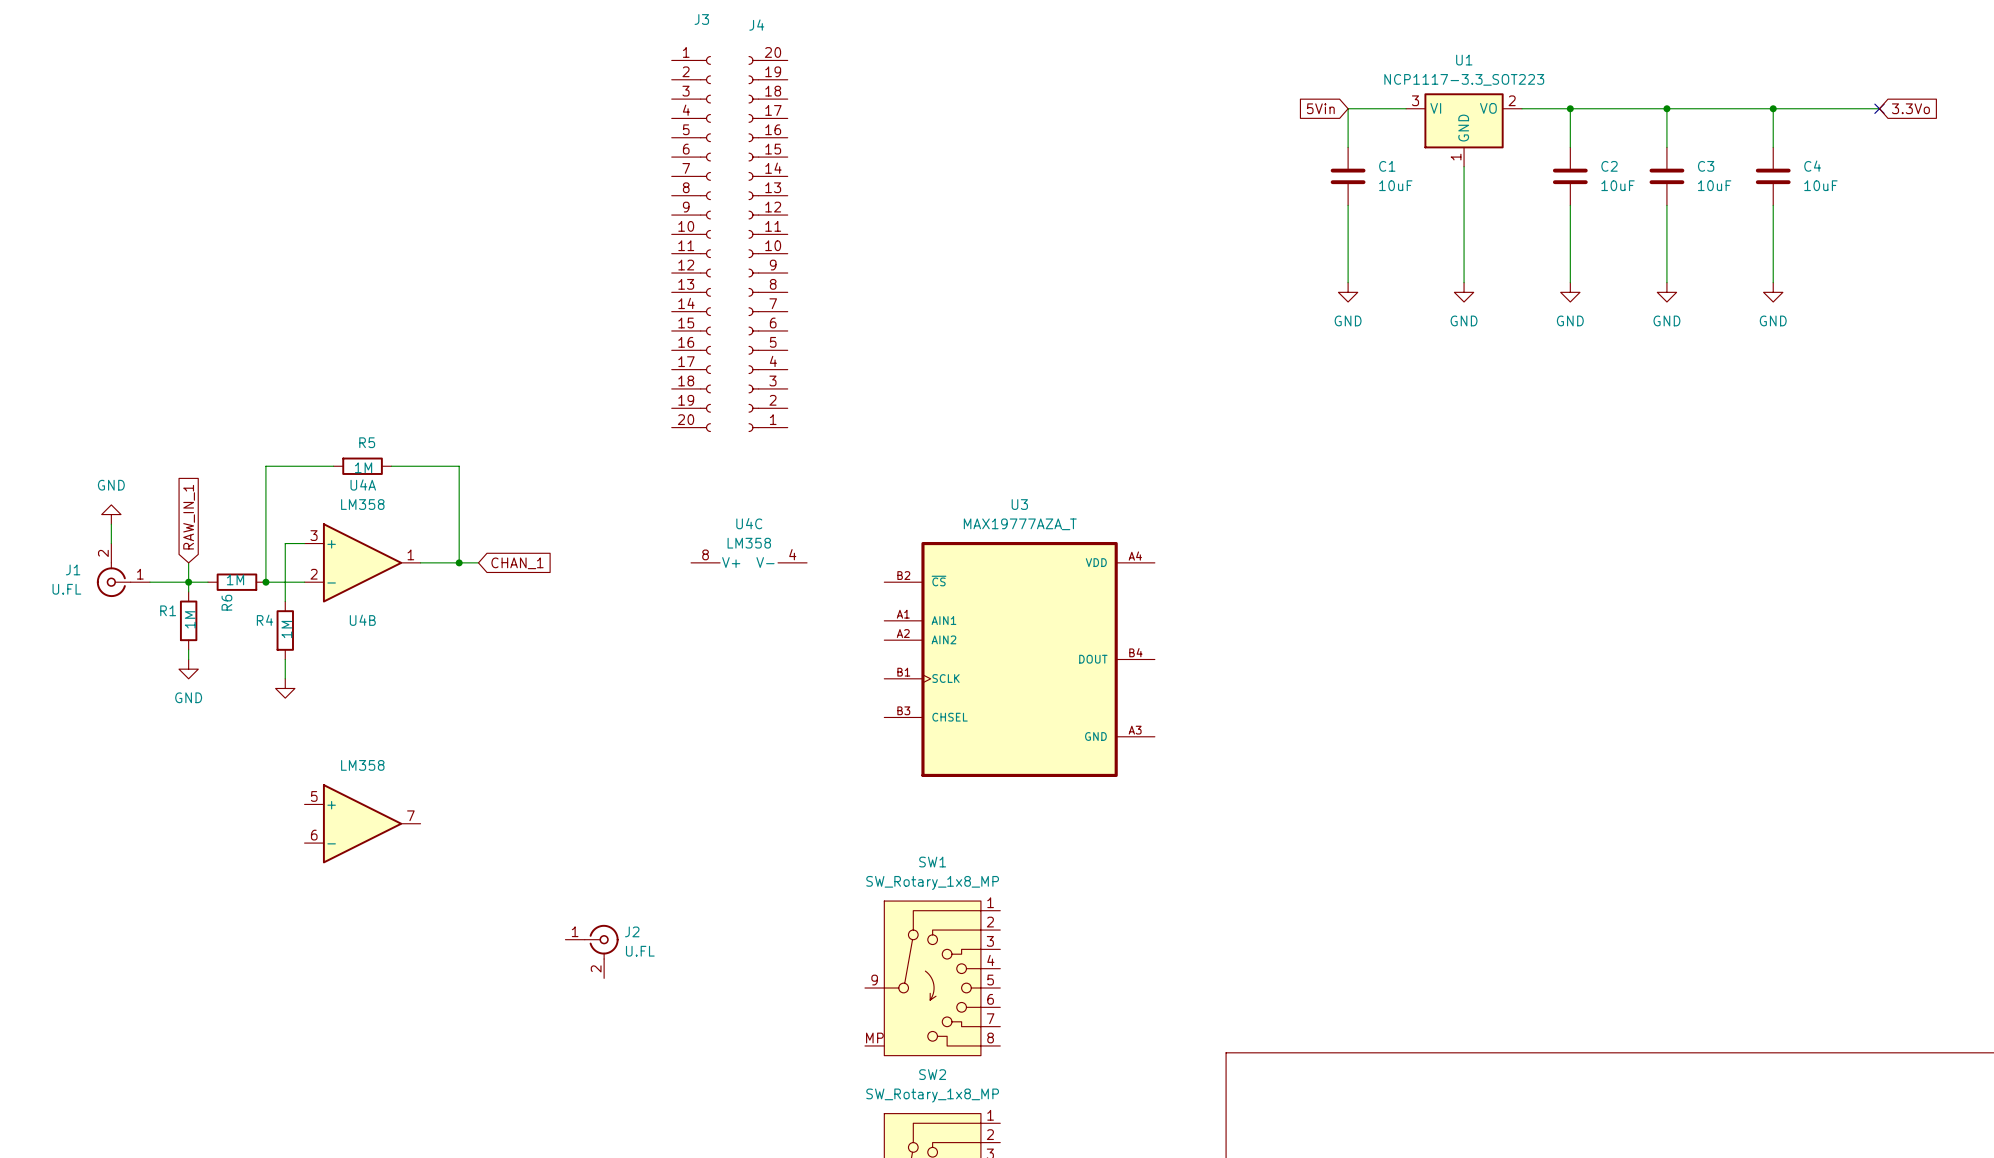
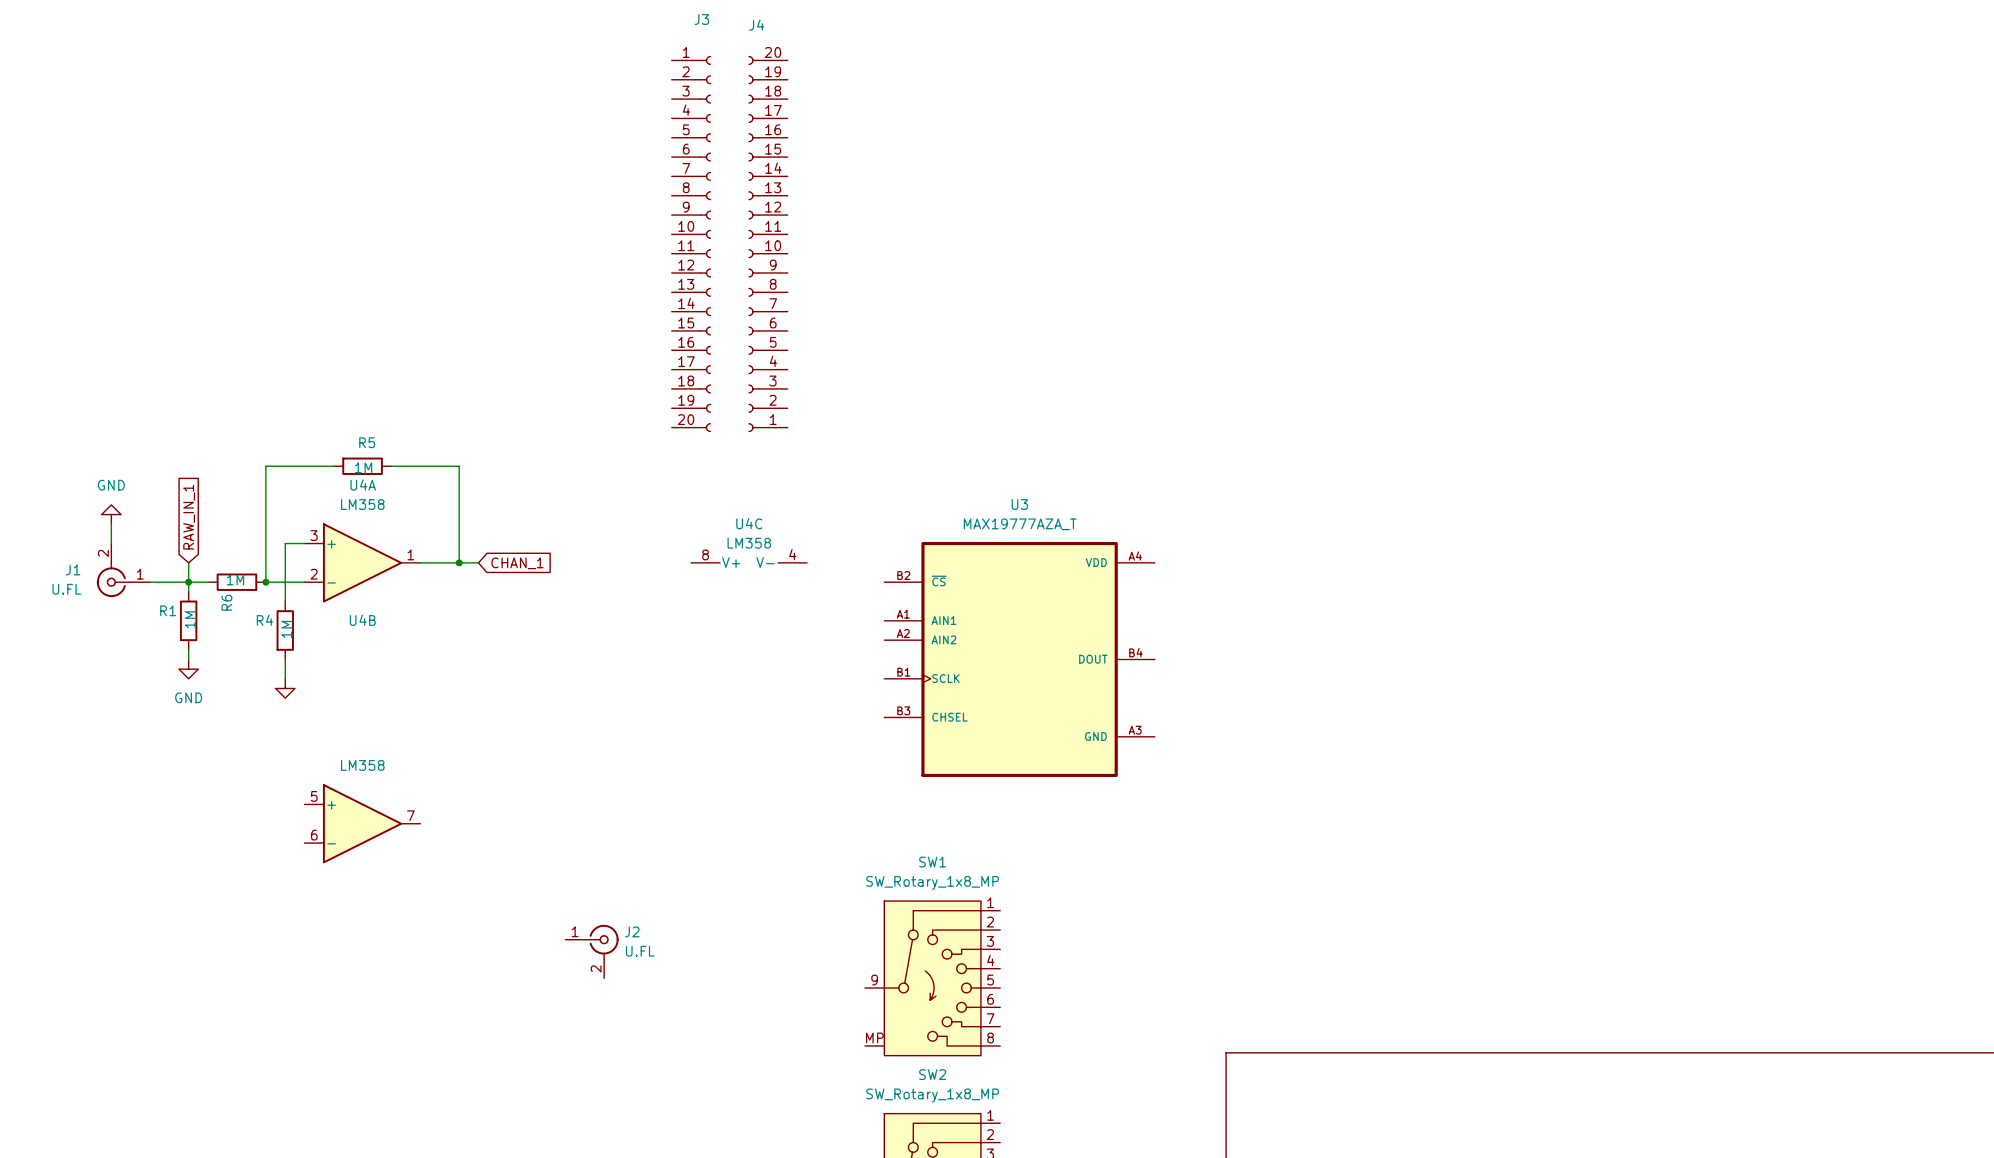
global label: 5Vin (1320, 108) -> none
wire: (1406, 108) (1348, 108) (1348, 147) -> none
wire: (1522, 108) (1879, 108) -> none
wire: (1570, 108) (1570, 147) -> none
junction: (1570, 108) -> none
wire: (1666, 108) (1666, 147) -> none
junction: (1666, 108) -> none
wire: (1773, 108) (1773, 147) -> none
junction: (1773, 108) -> none
no-connect mark: (1879, 108) -> none
global label: 3.3Vo (1910, 108) -> none
U1: NCP1117-3.3_SOT223 (1464, 130) -> none
wire: (1464, 166) (1464, 282) -> none
C1: 10uF (1348, 176) -> none
C2: 10uF (1570, 176) -> none
C3: 10uF (1666, 176) -> none
C4: 10uF (1773, 176) -> none
wire: (1348, 205) (1348, 282) -> none
wire: (1570, 205) (1570, 282) -> none
wire: (1666, 205) (1666, 282) -> none
wire: (1773, 205) (1773, 282) -> none
power symbol: GND (1348, 292) -> none
power symbol: GND (1464, 292) -> none
power symbol: GND (1570, 292) -> none
power symbol: GND (1666, 292) -> none
power symbol: GND (1773, 292) -> none

